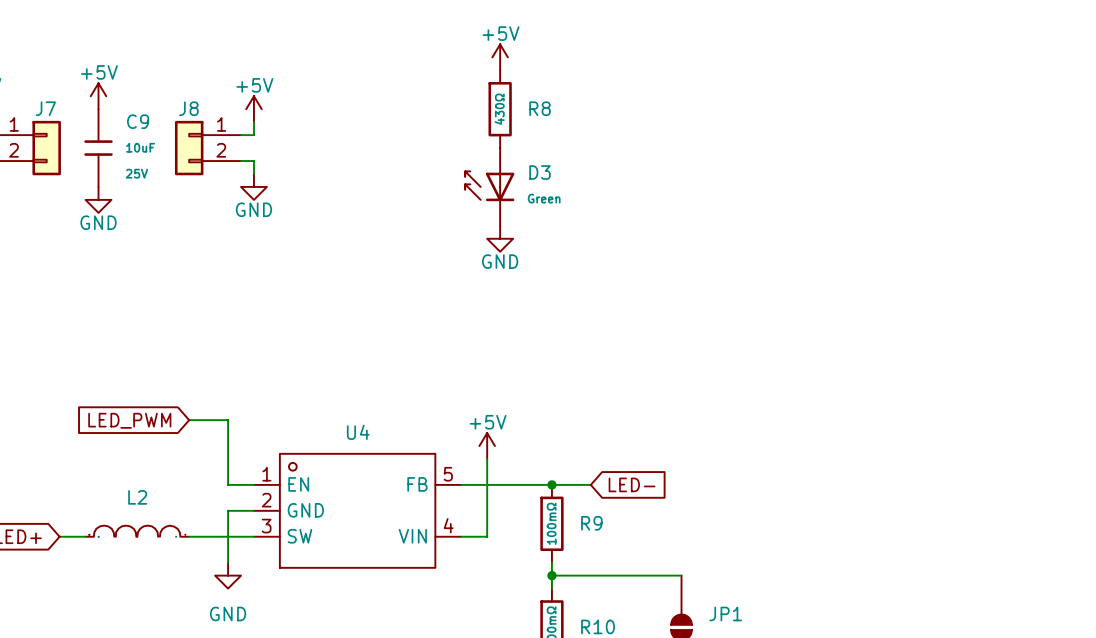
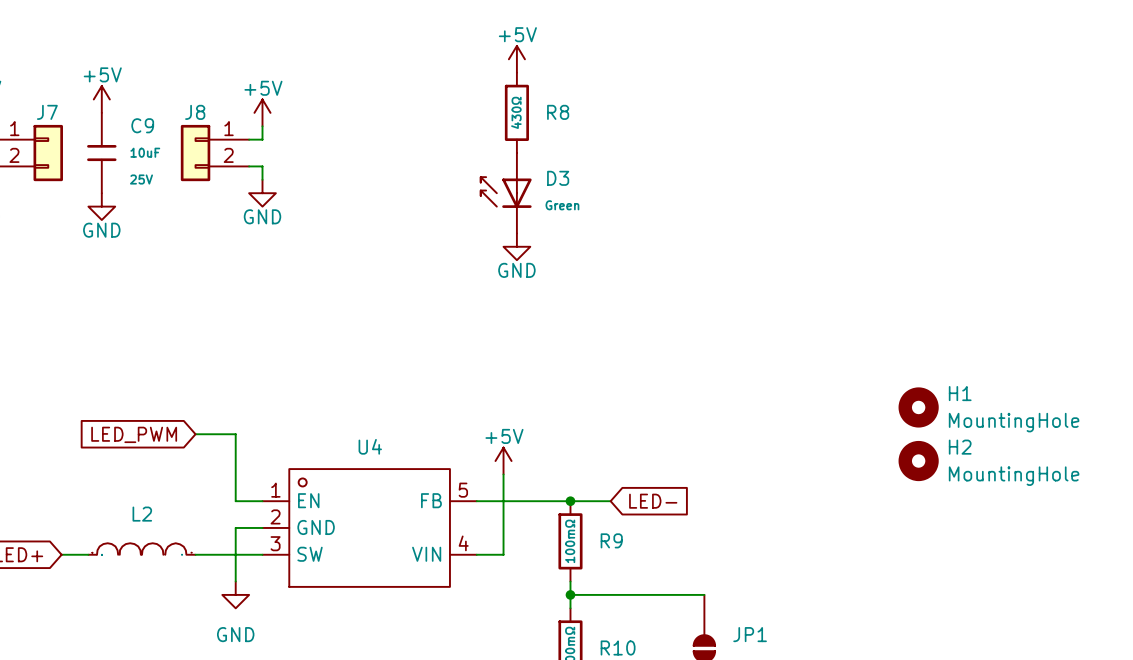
H1: none -> MountingHole (918, 407)
H2: none -> MountingHole (918, 461)

